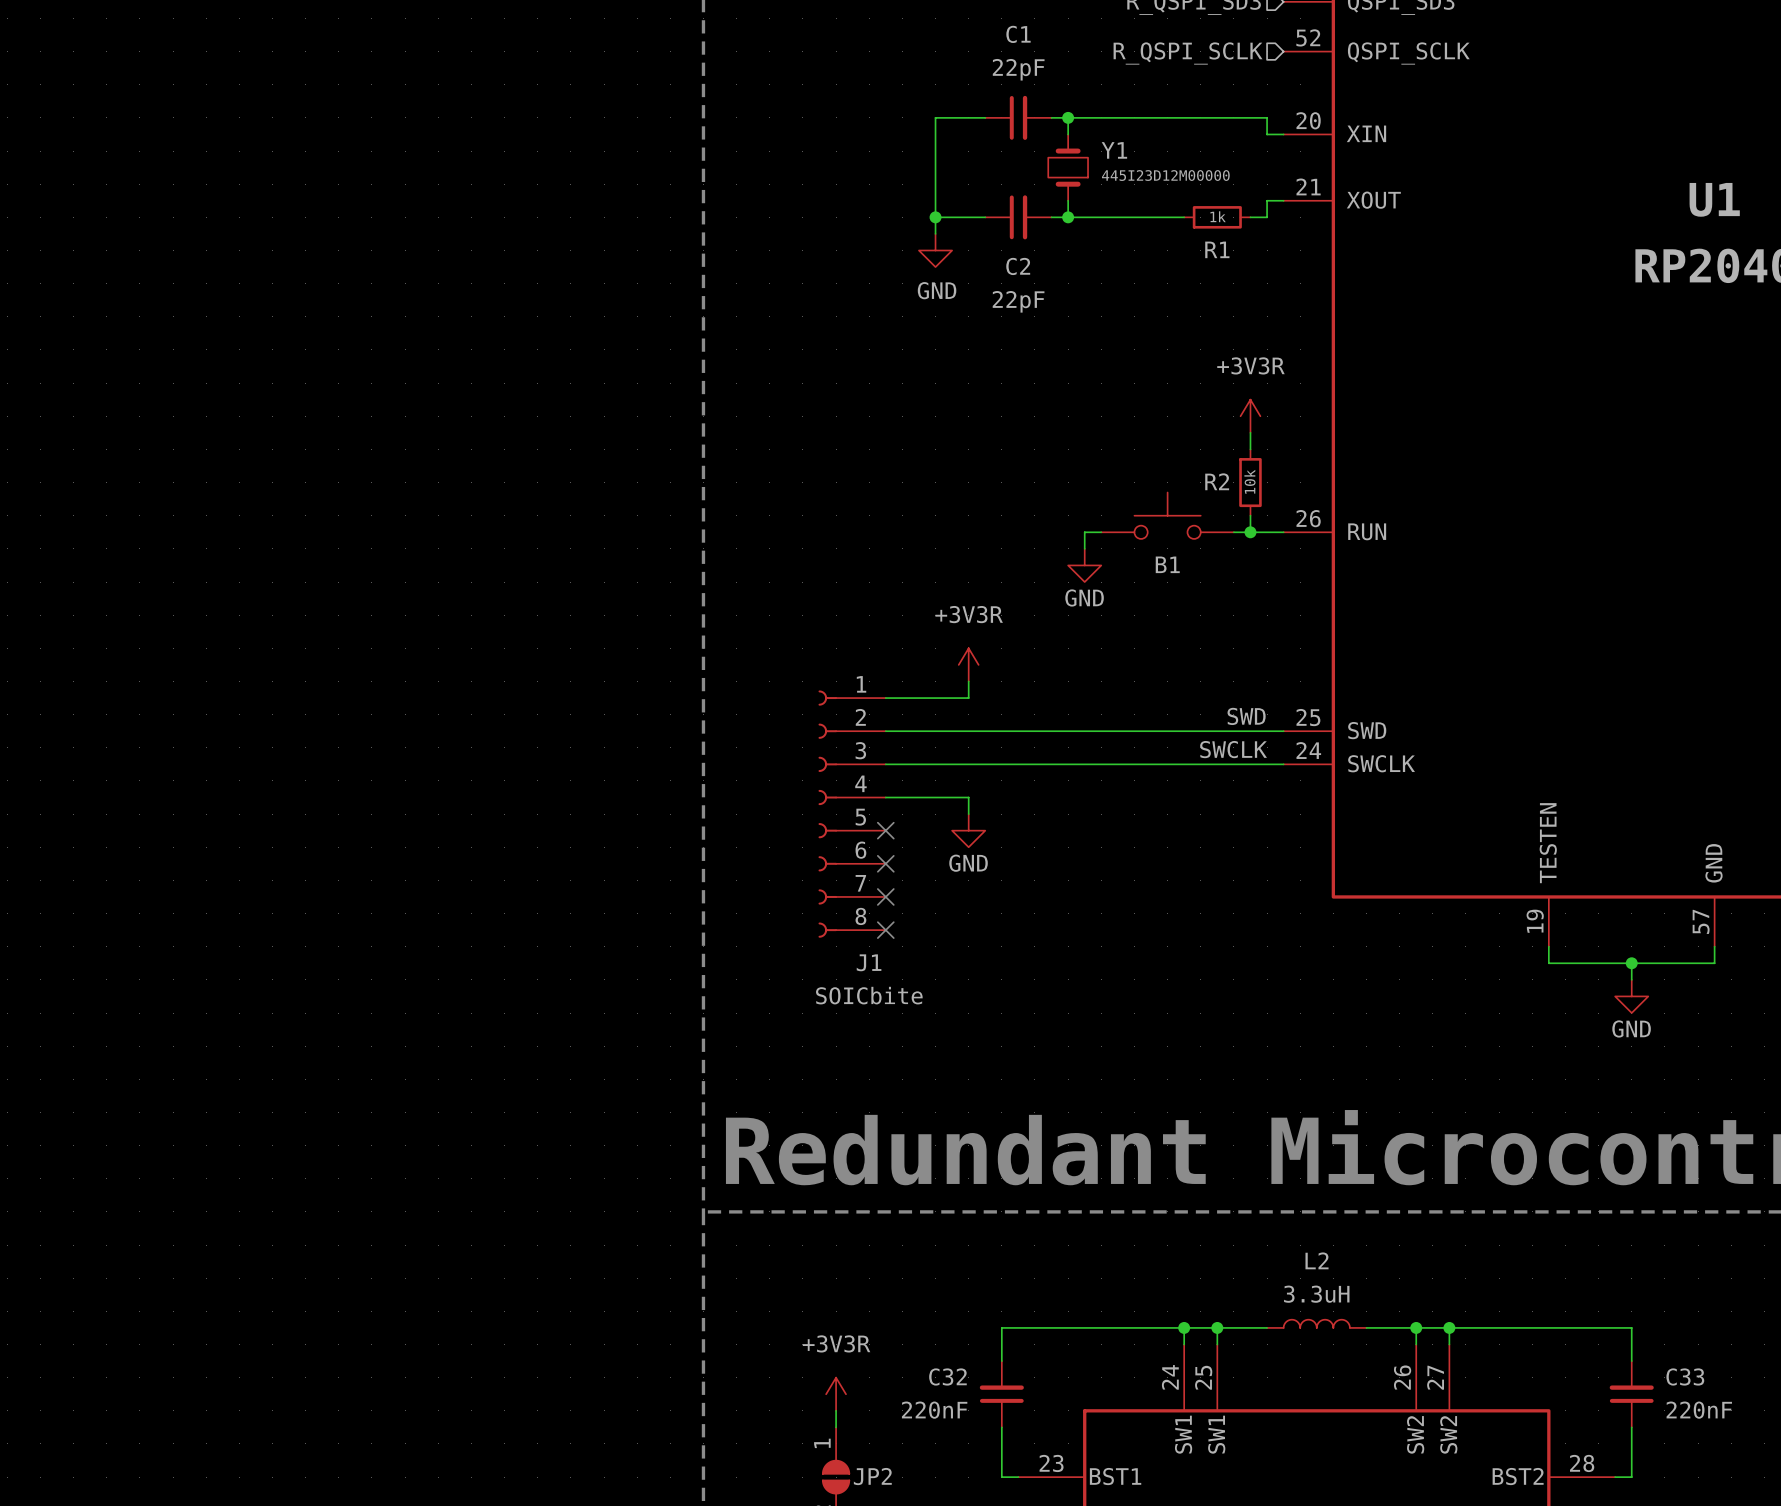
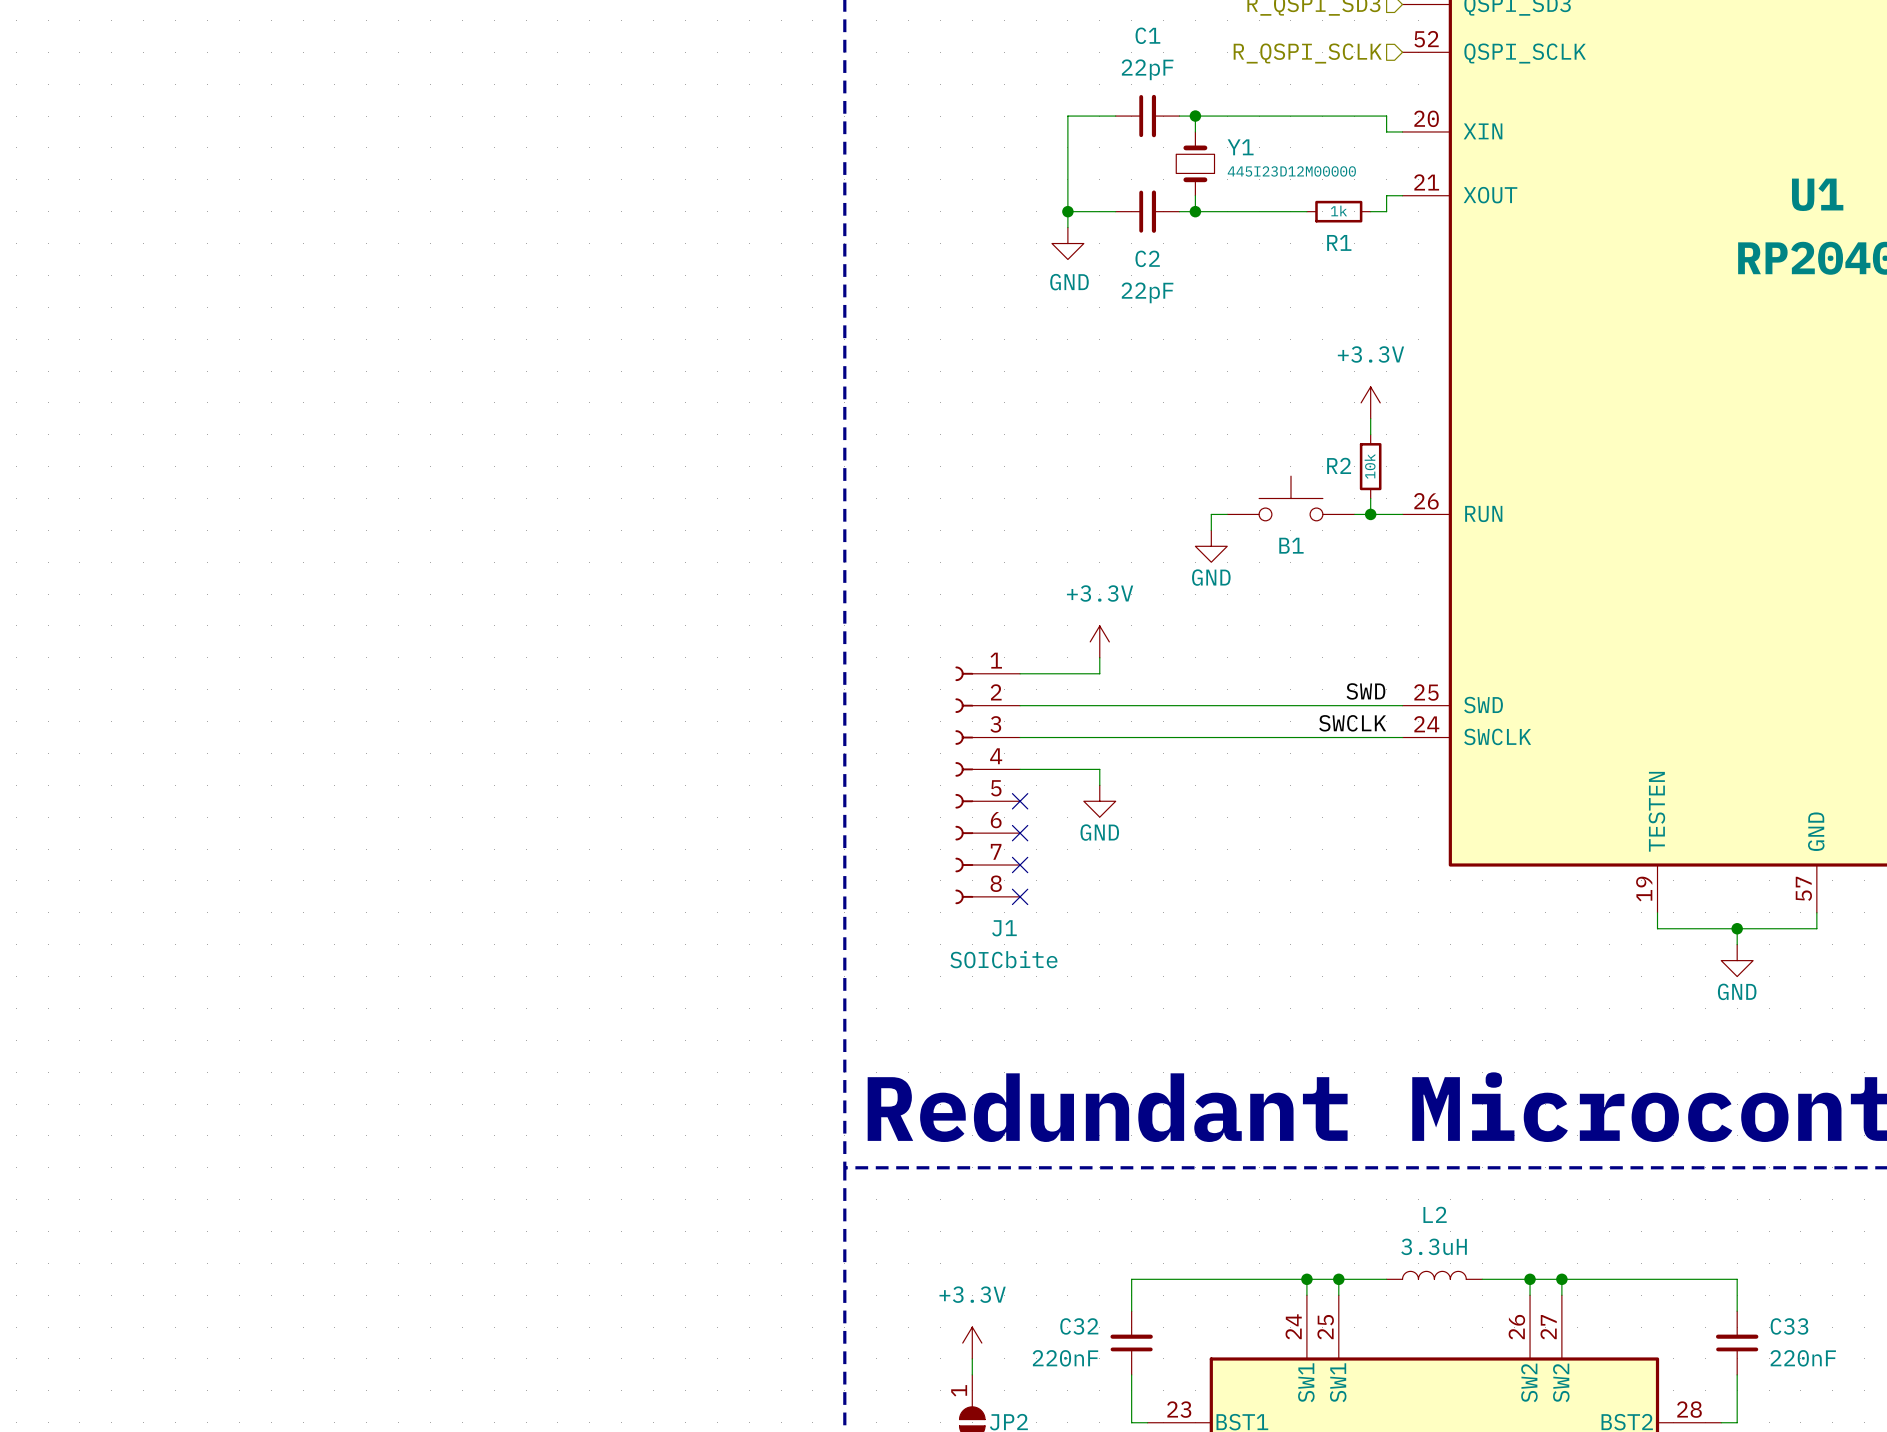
power symbol: +3V3R (1250, 416) -> +3.3V (1370, 402)
power symbol: +3V3R (968, 664) -> +3.3V (1099, 641)
power symbol: +3V3R (836, 1394) -> +3.3V (972, 1343)

